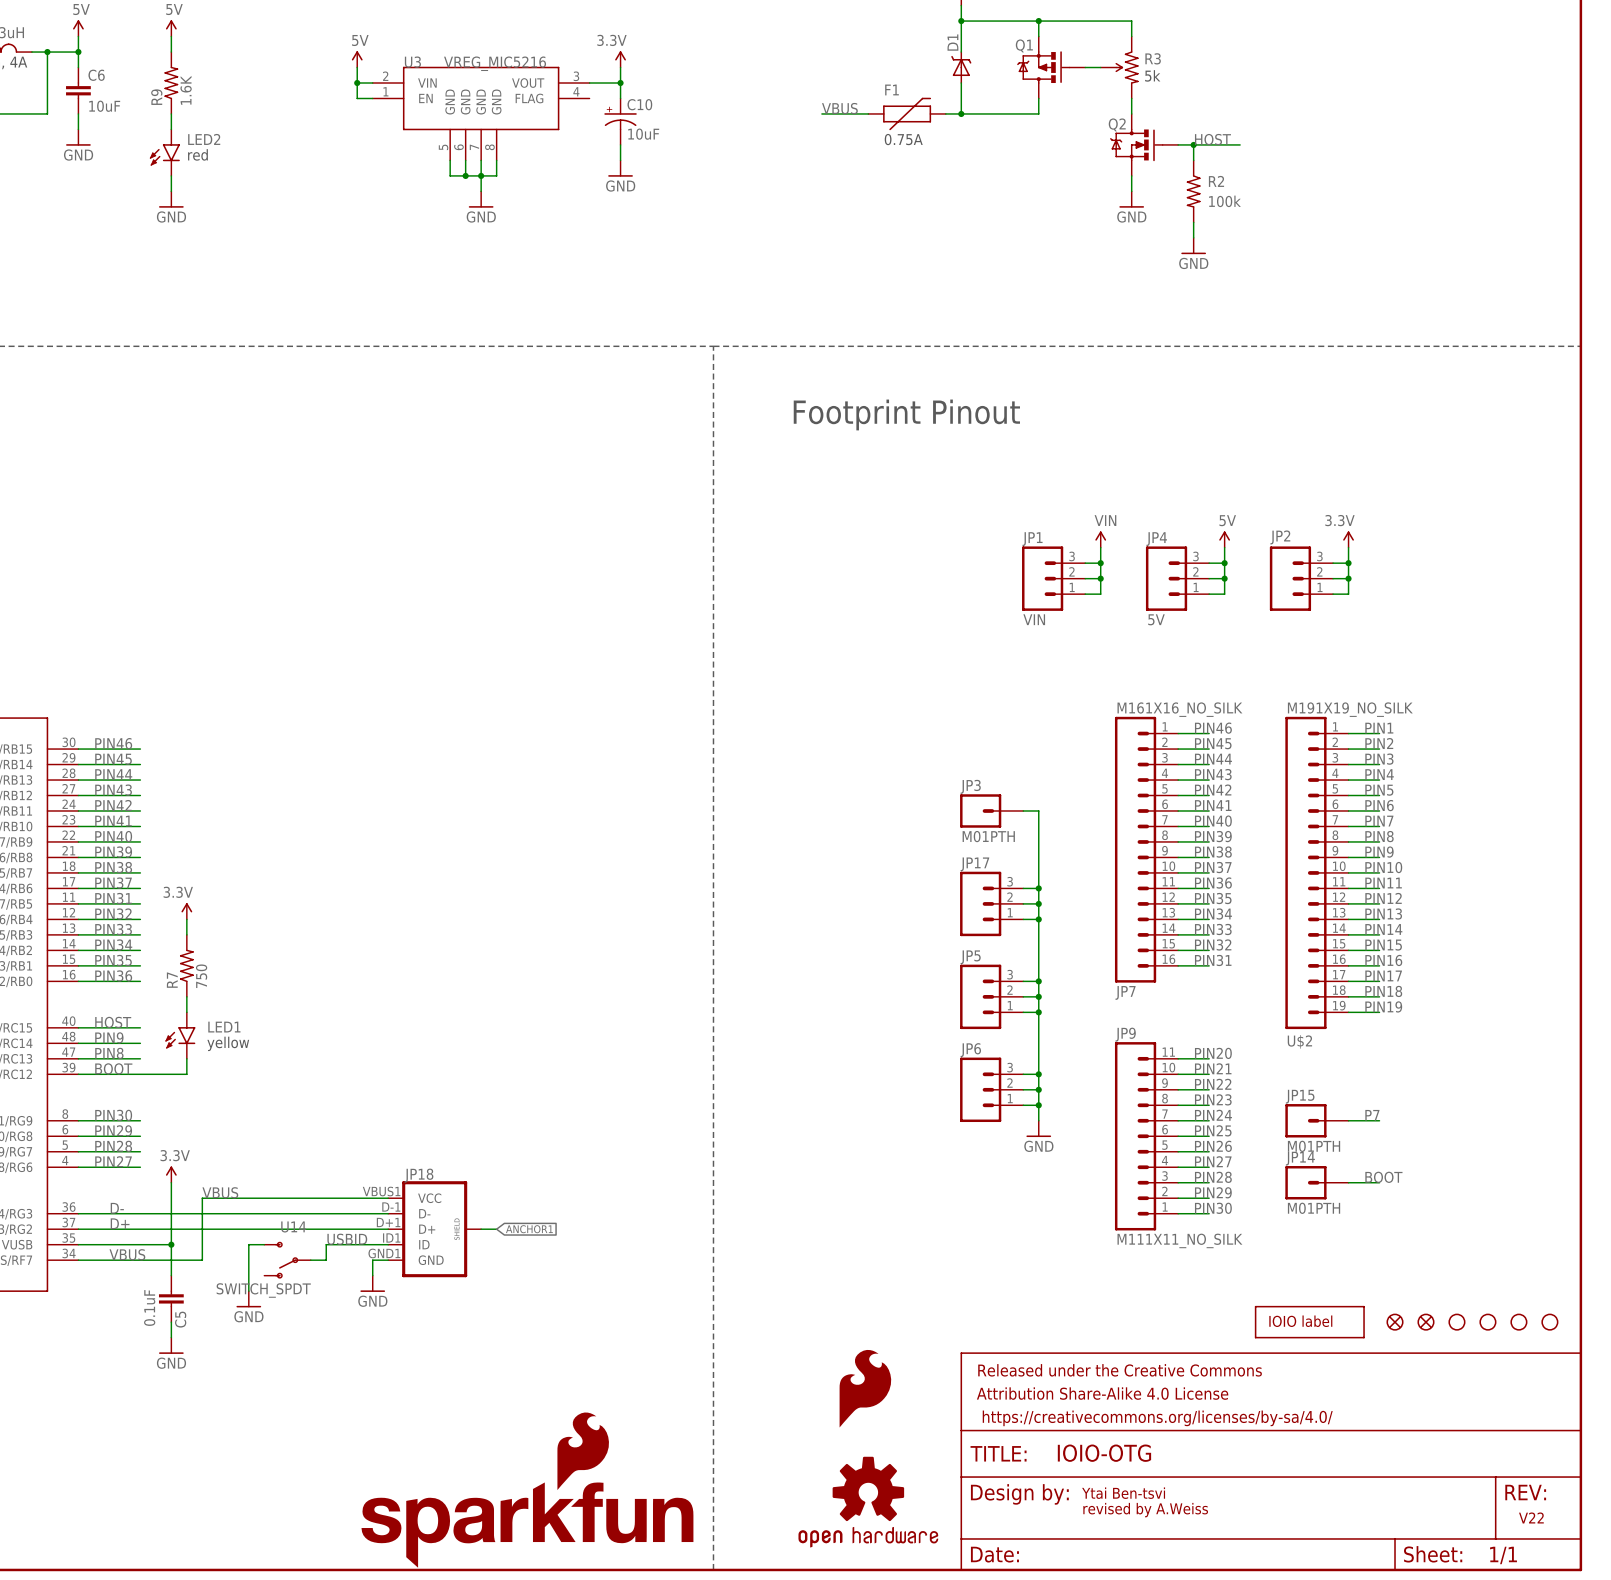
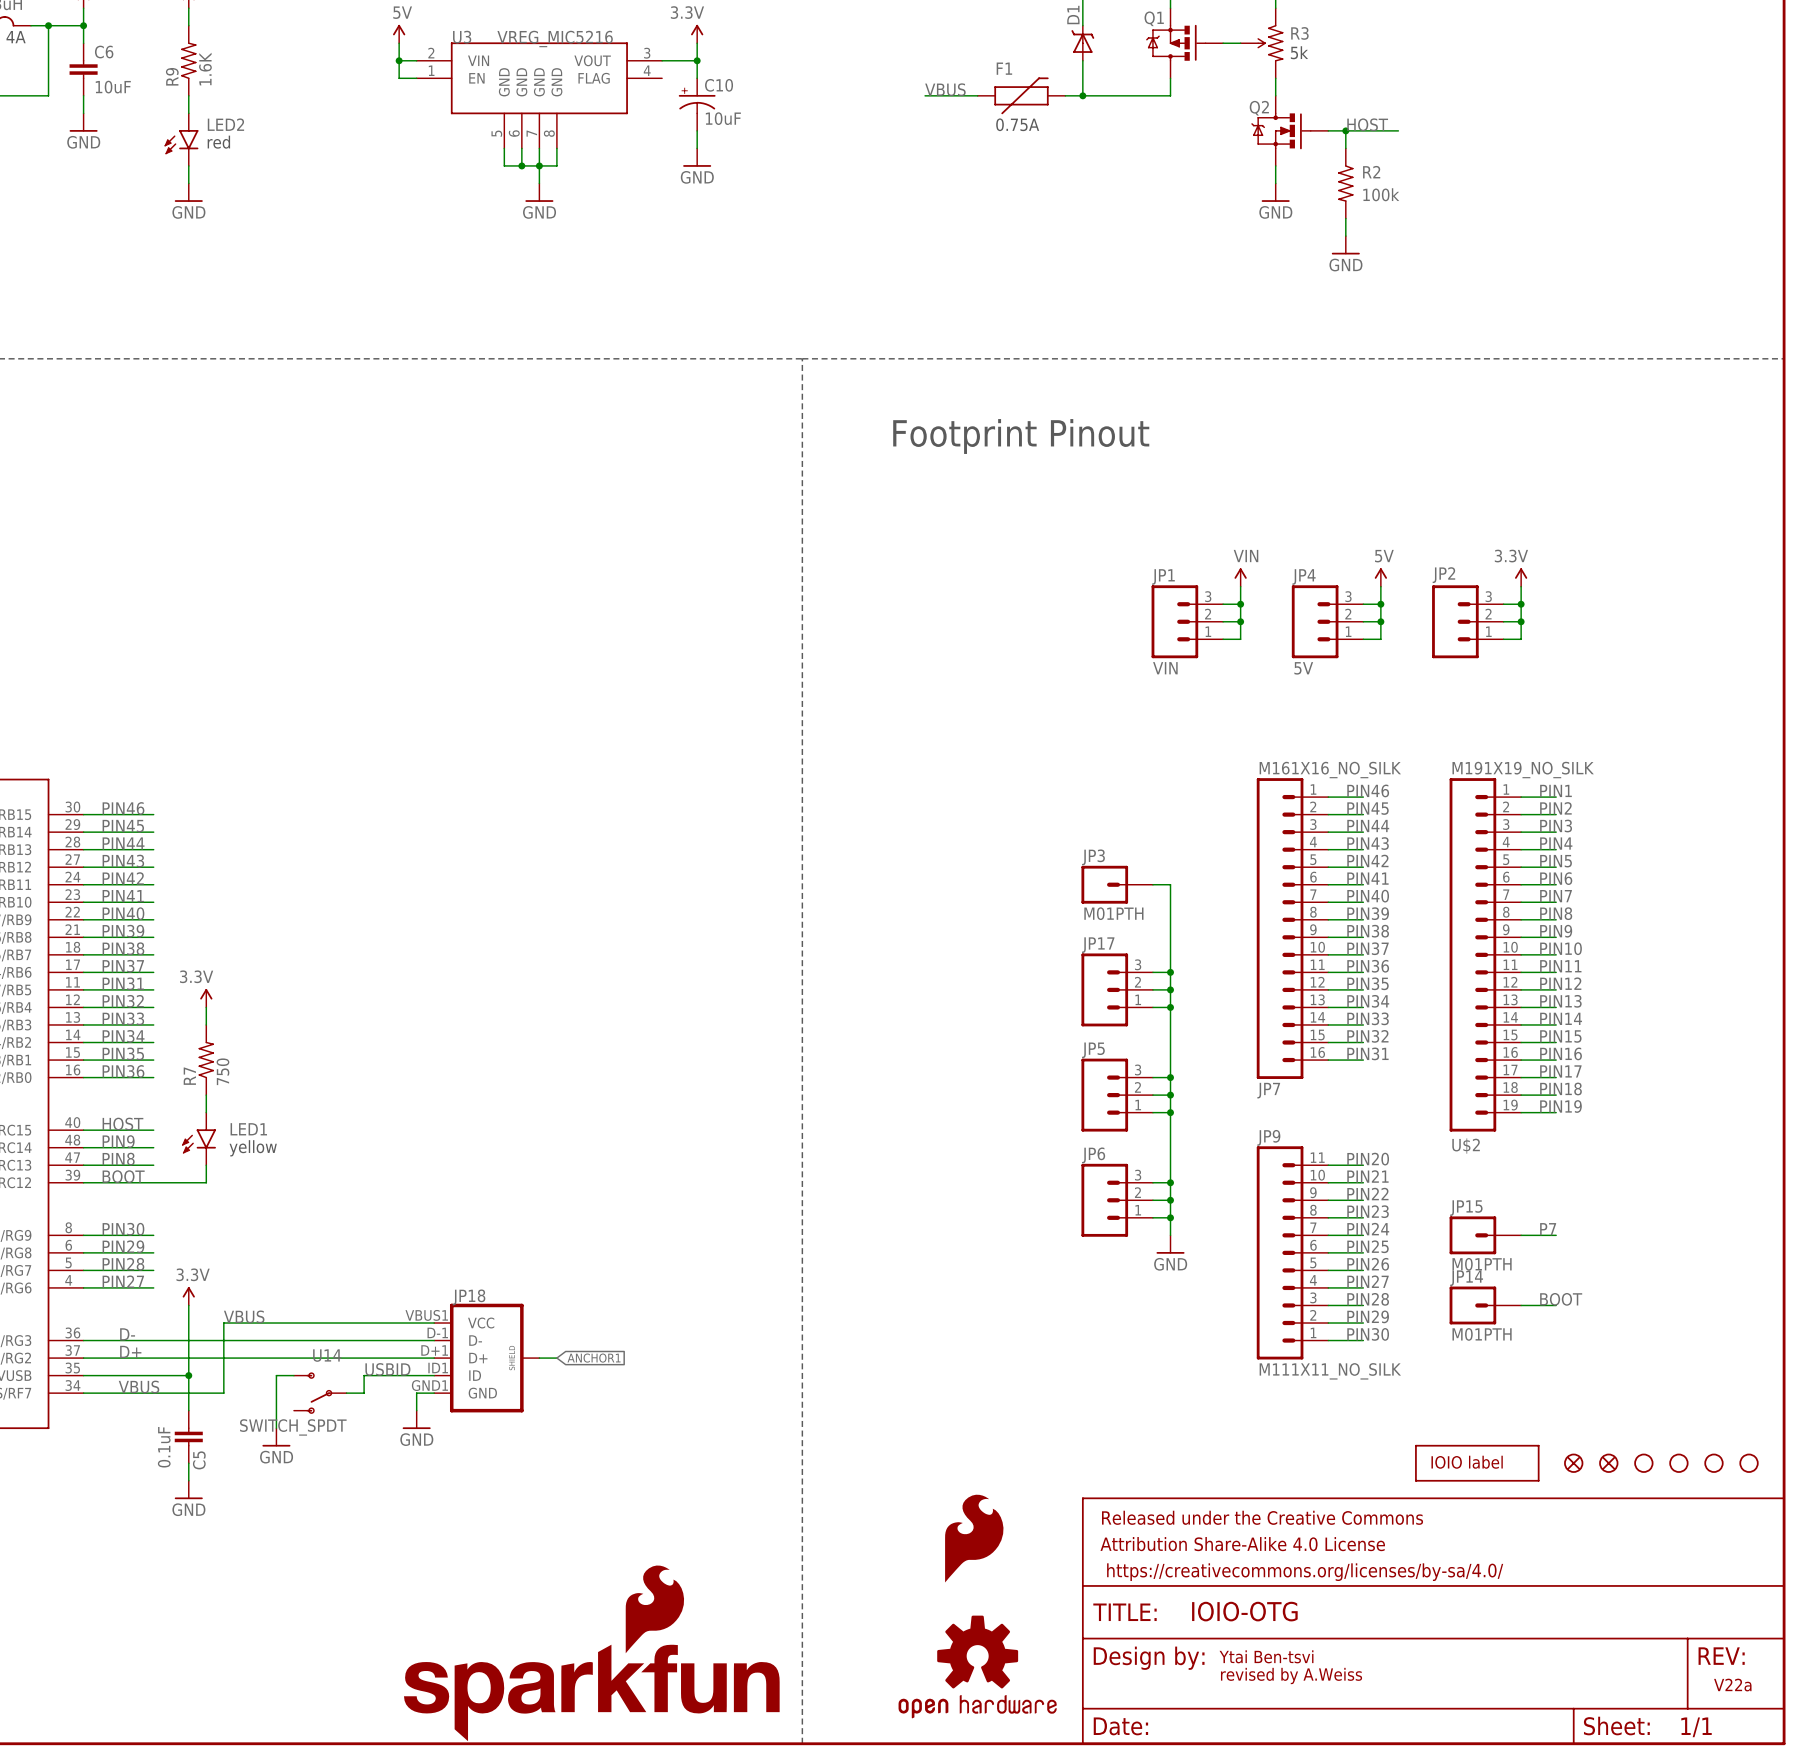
text: V22 (1531, 1517) -> V22a (1732, 1685)

